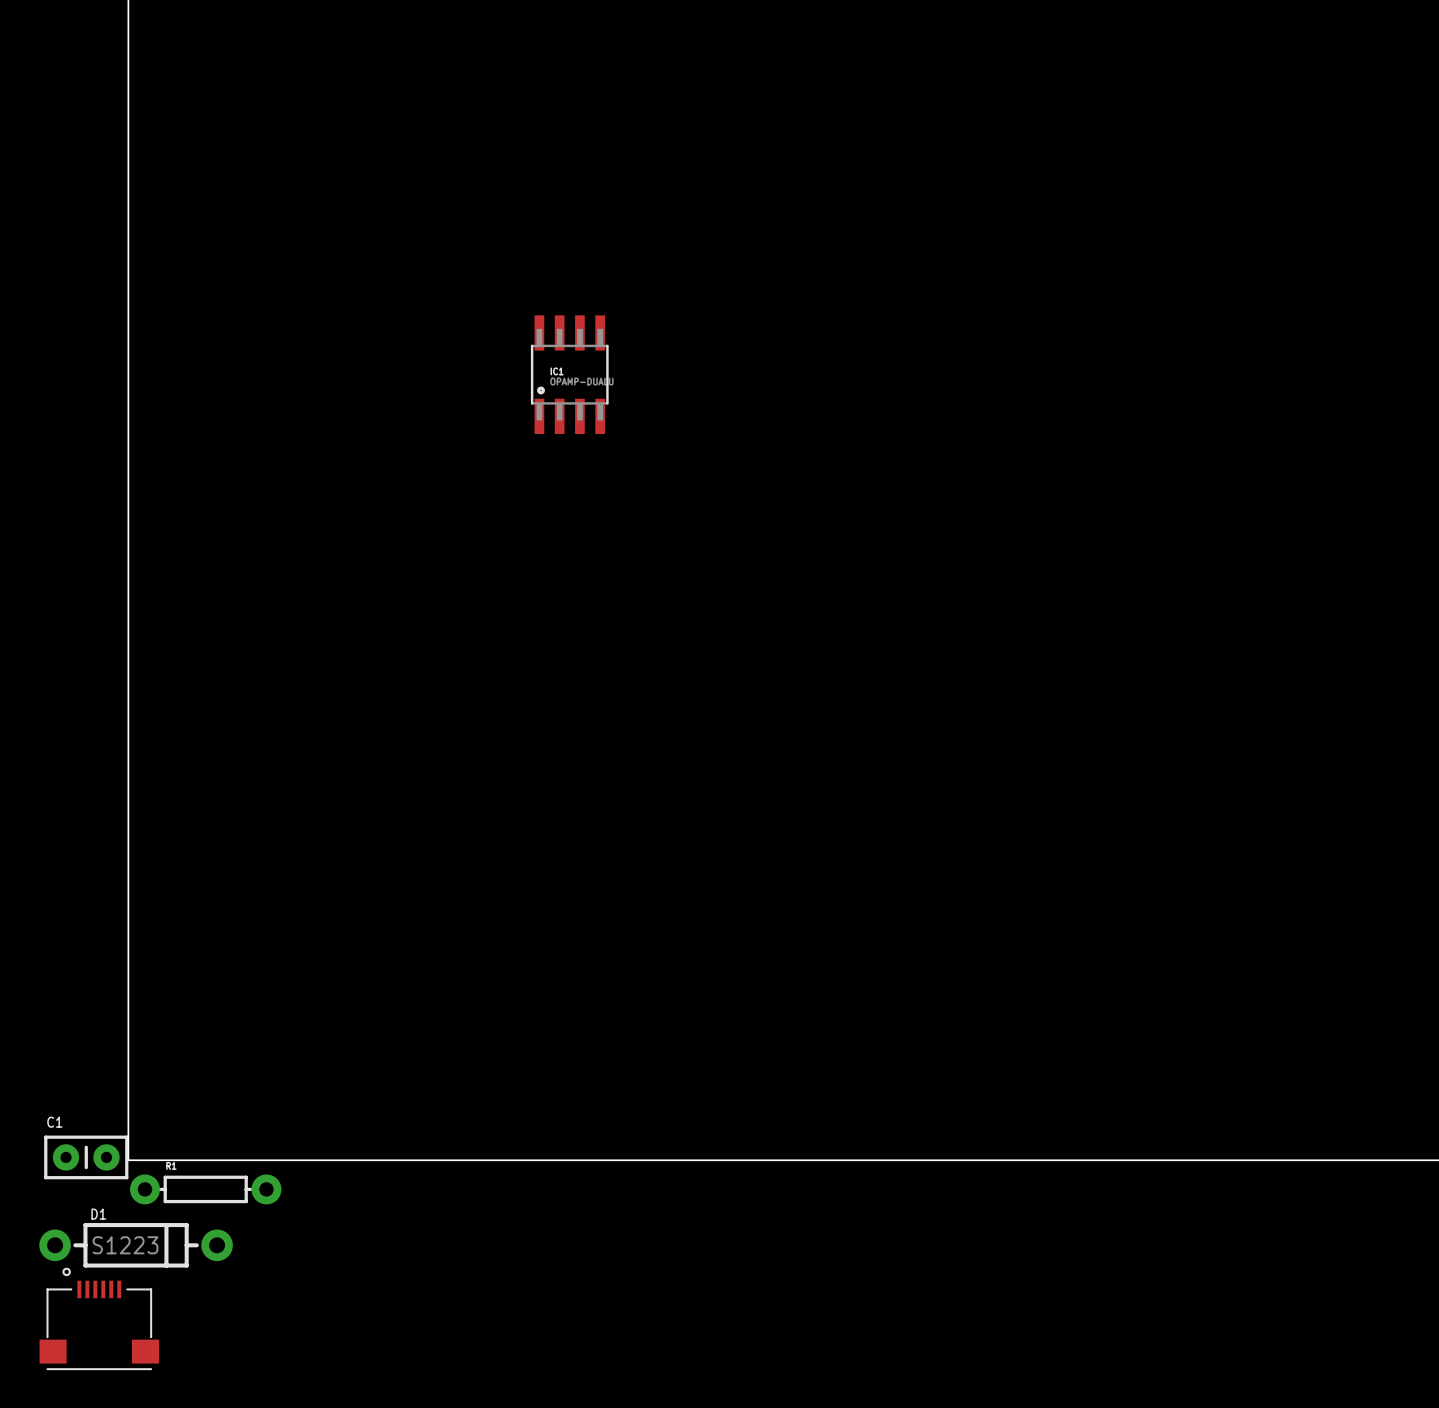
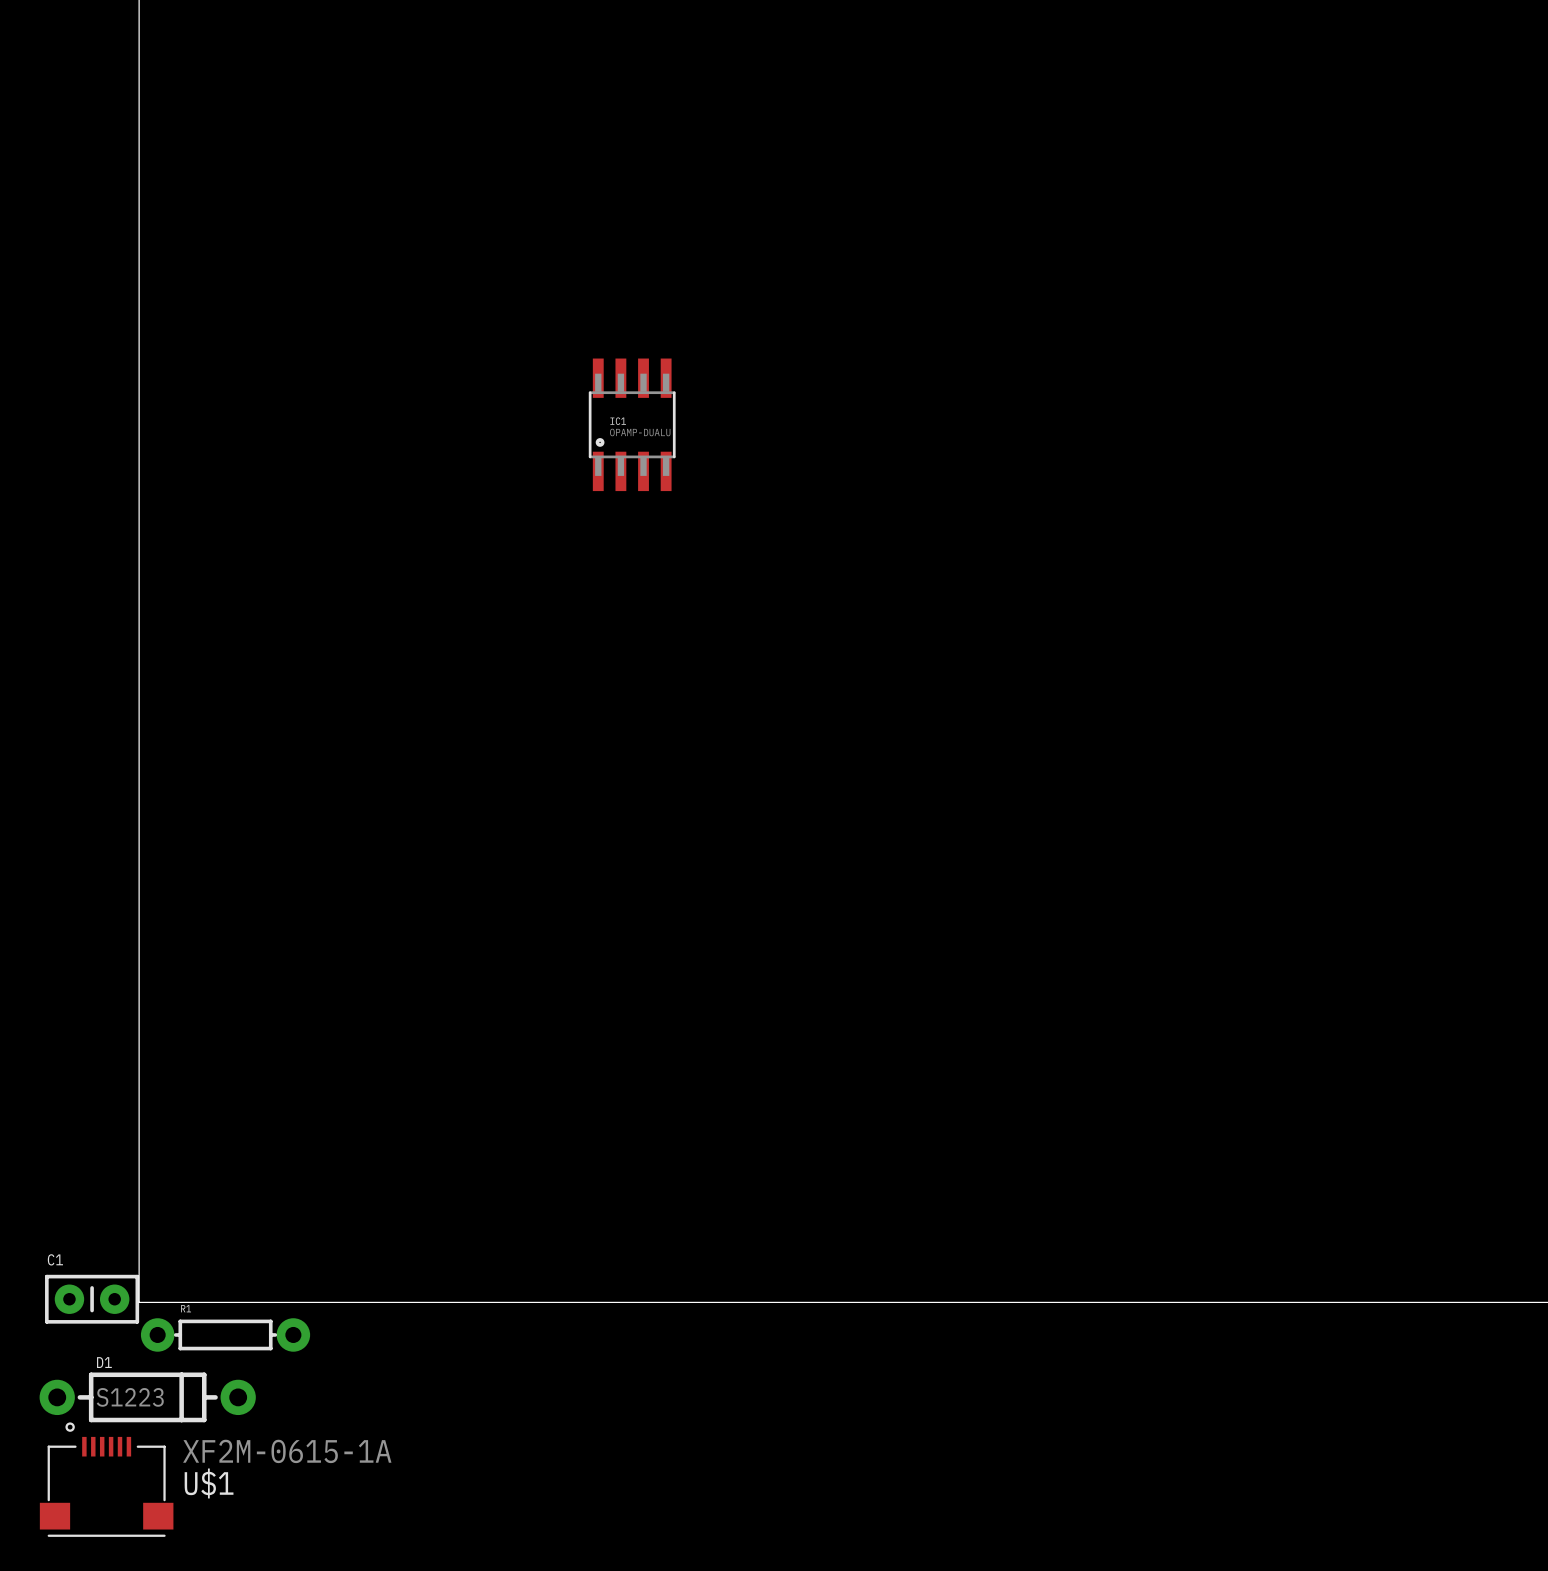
U$1 value: none -> XF2M-0615-1A (287, 1451)
U$1 name: none -> U$1 (209, 1483)

